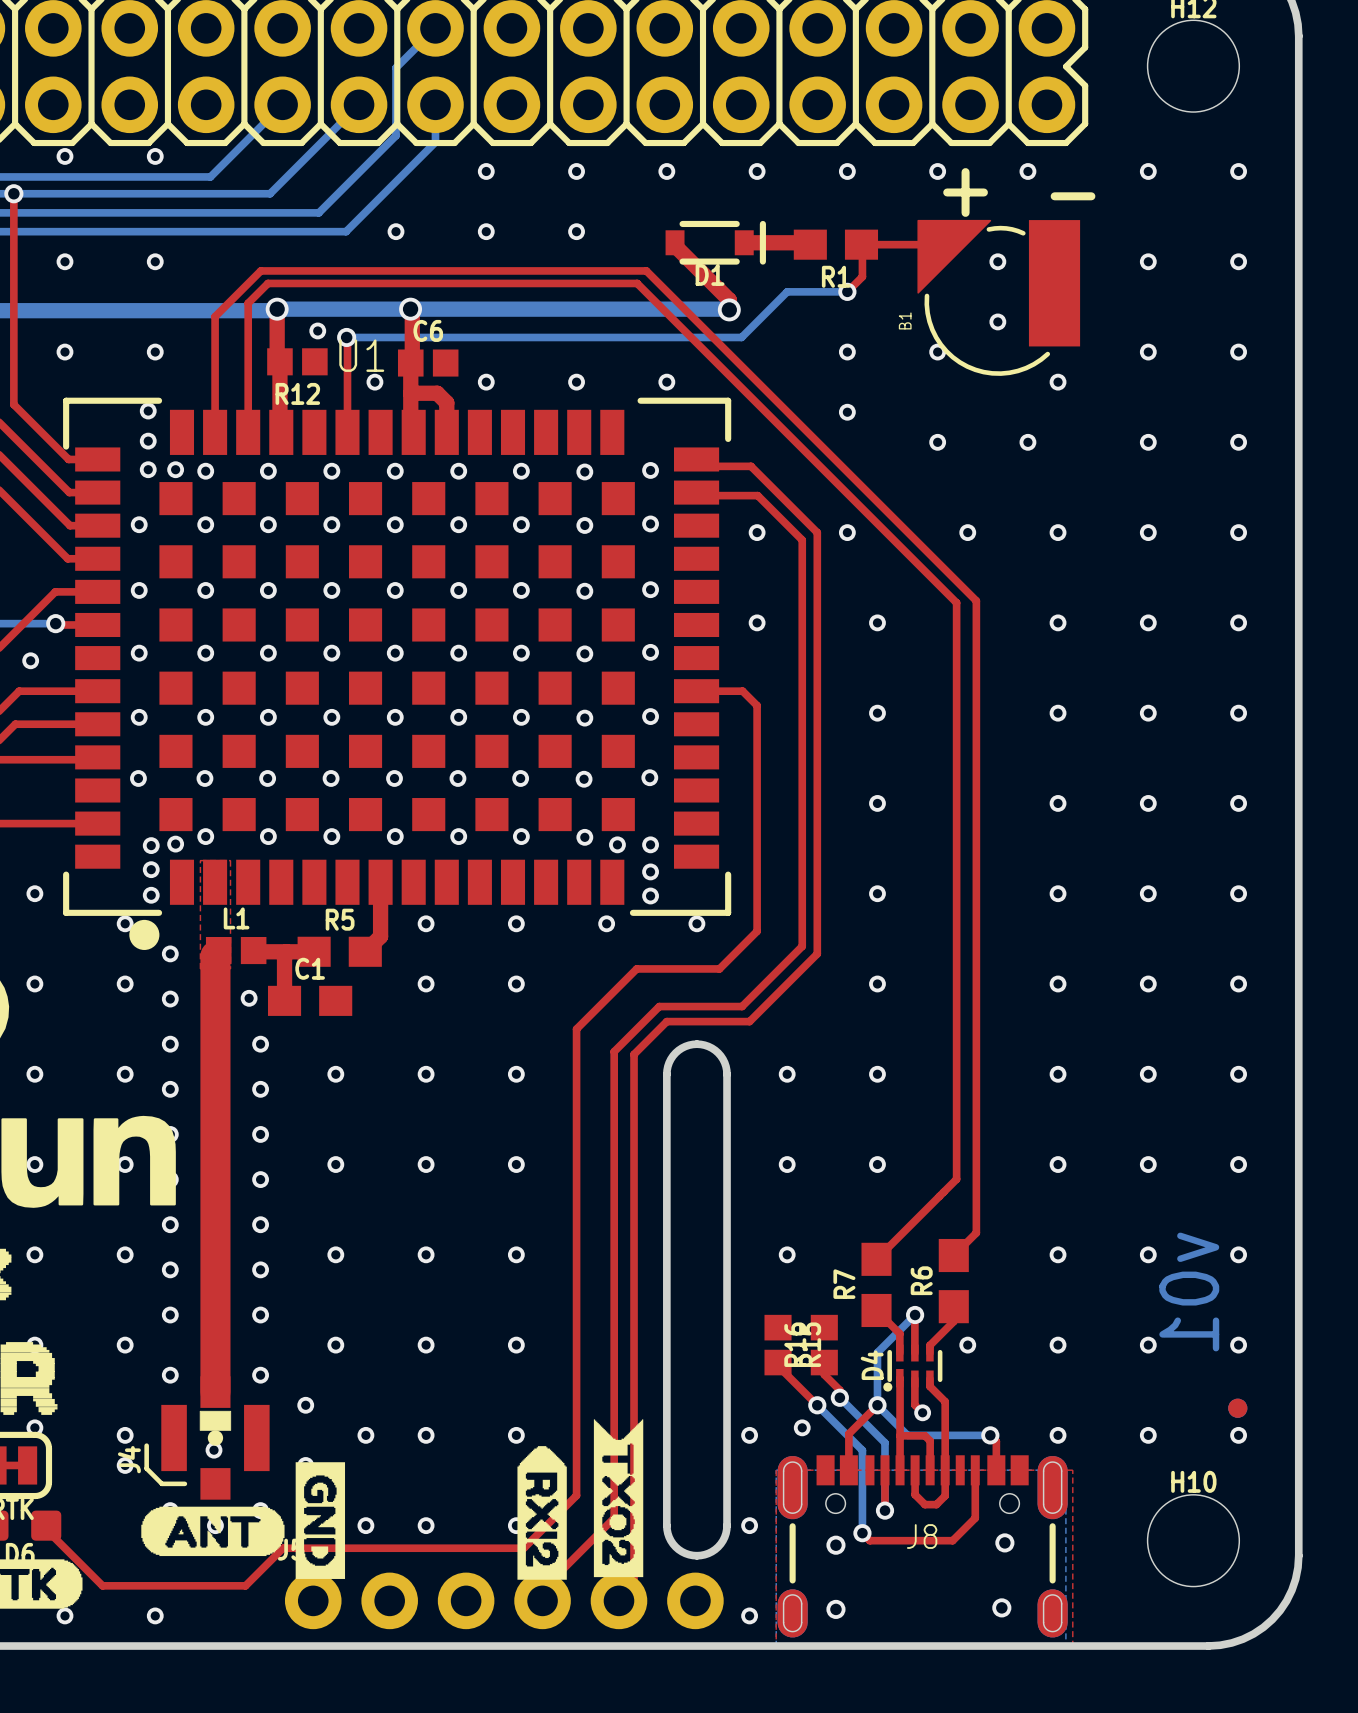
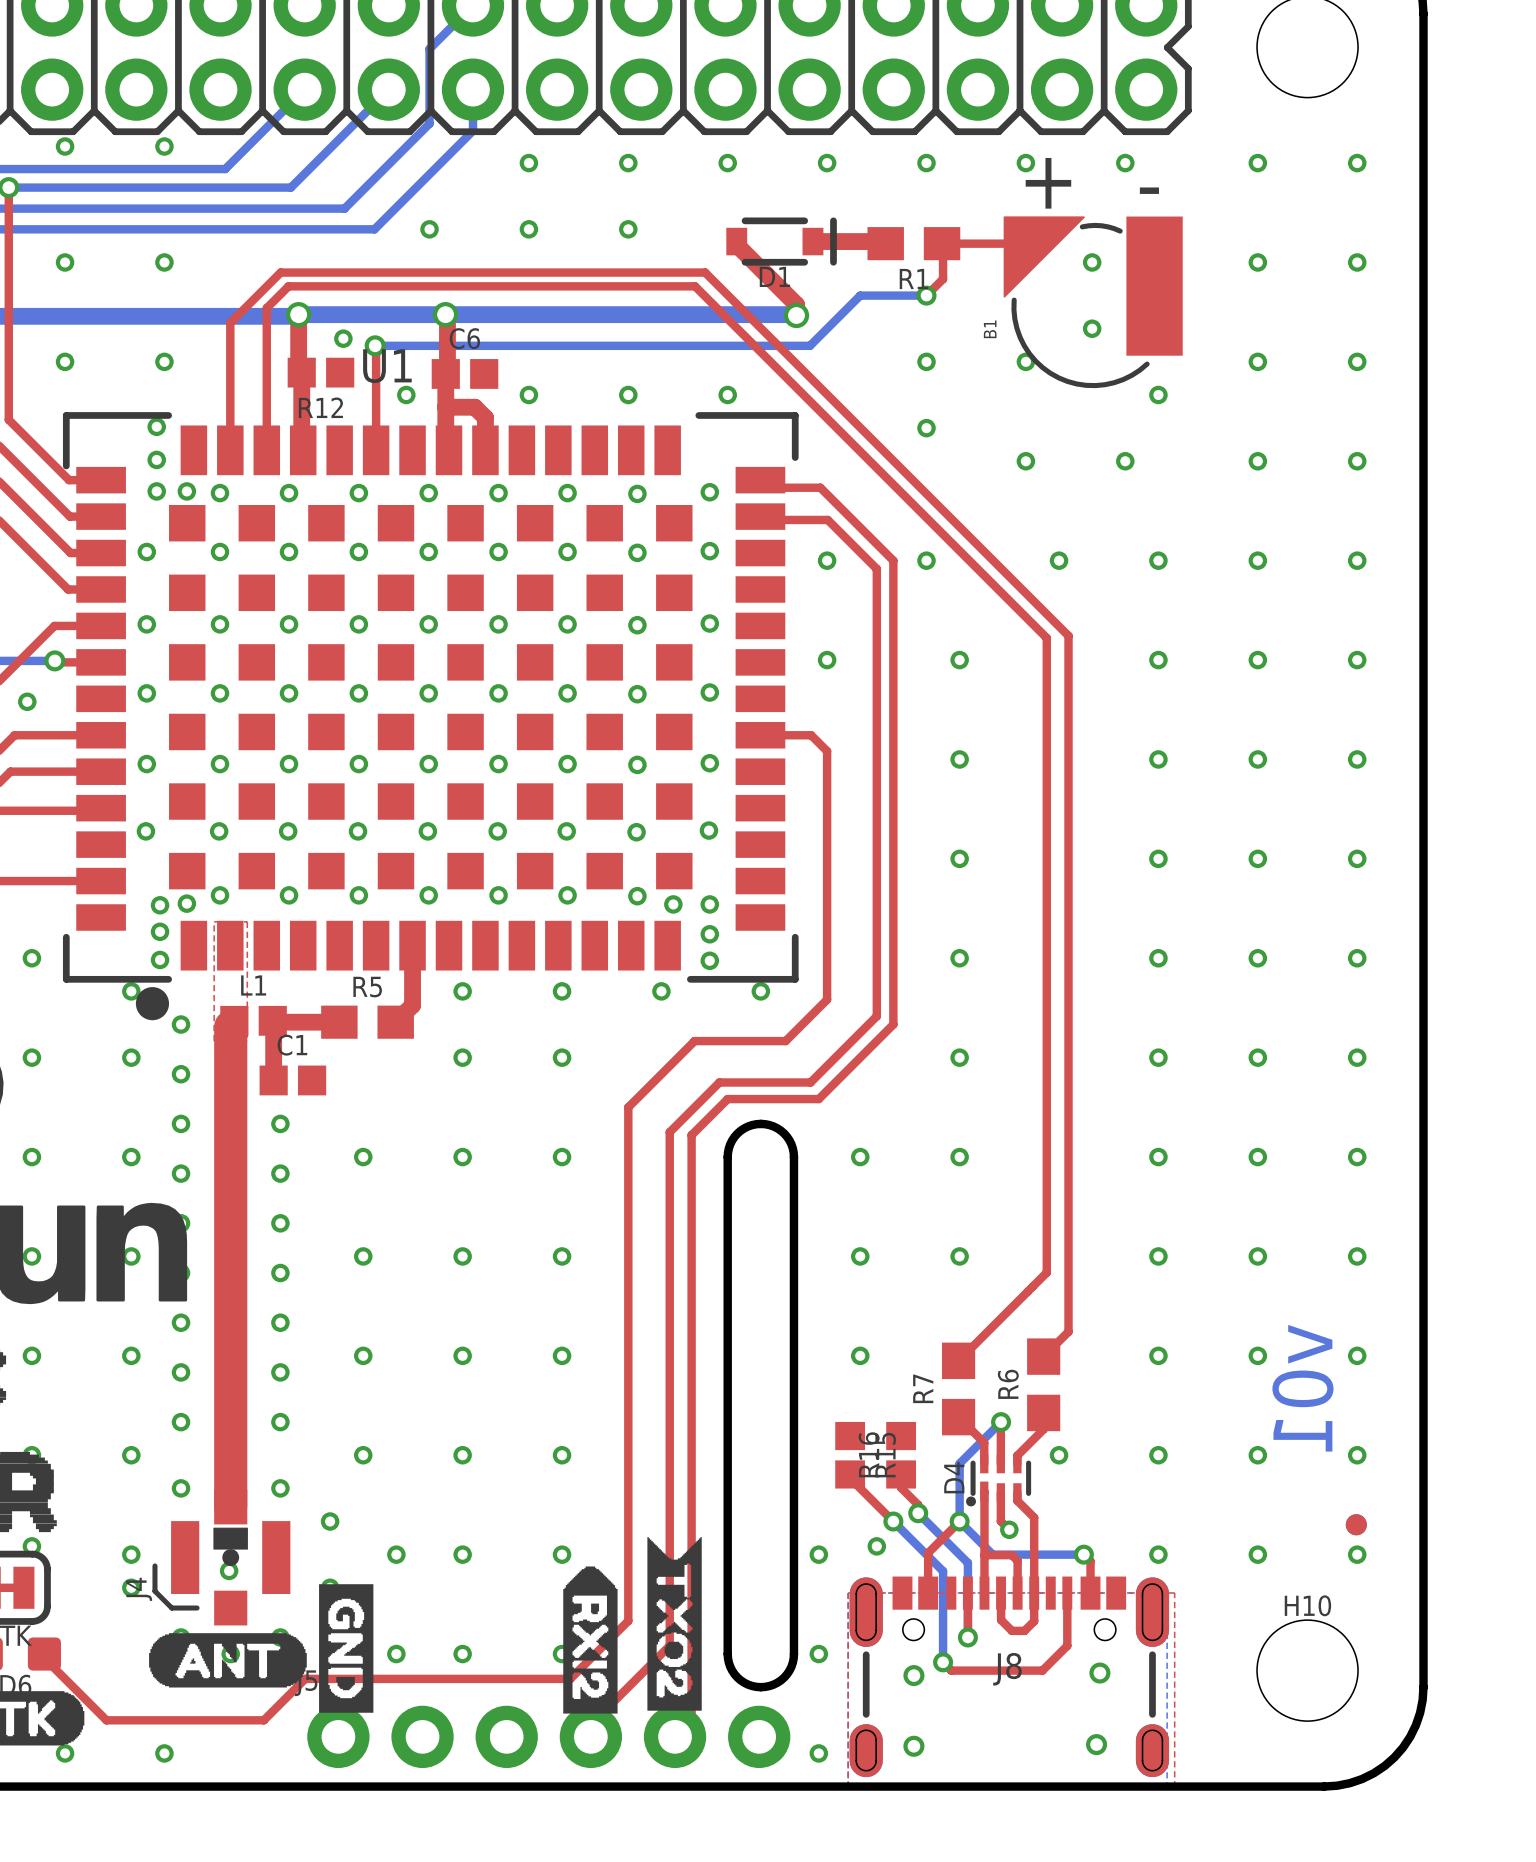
top track: none -> (273, 1021) (273, 1080)
top track: (286, 951) (284, 953) (284, 1000) -> none
C1 footprint: [267, 985, 353, 1016] -> [259, 1065, 327, 1096]
via: (249, 998) -> none

